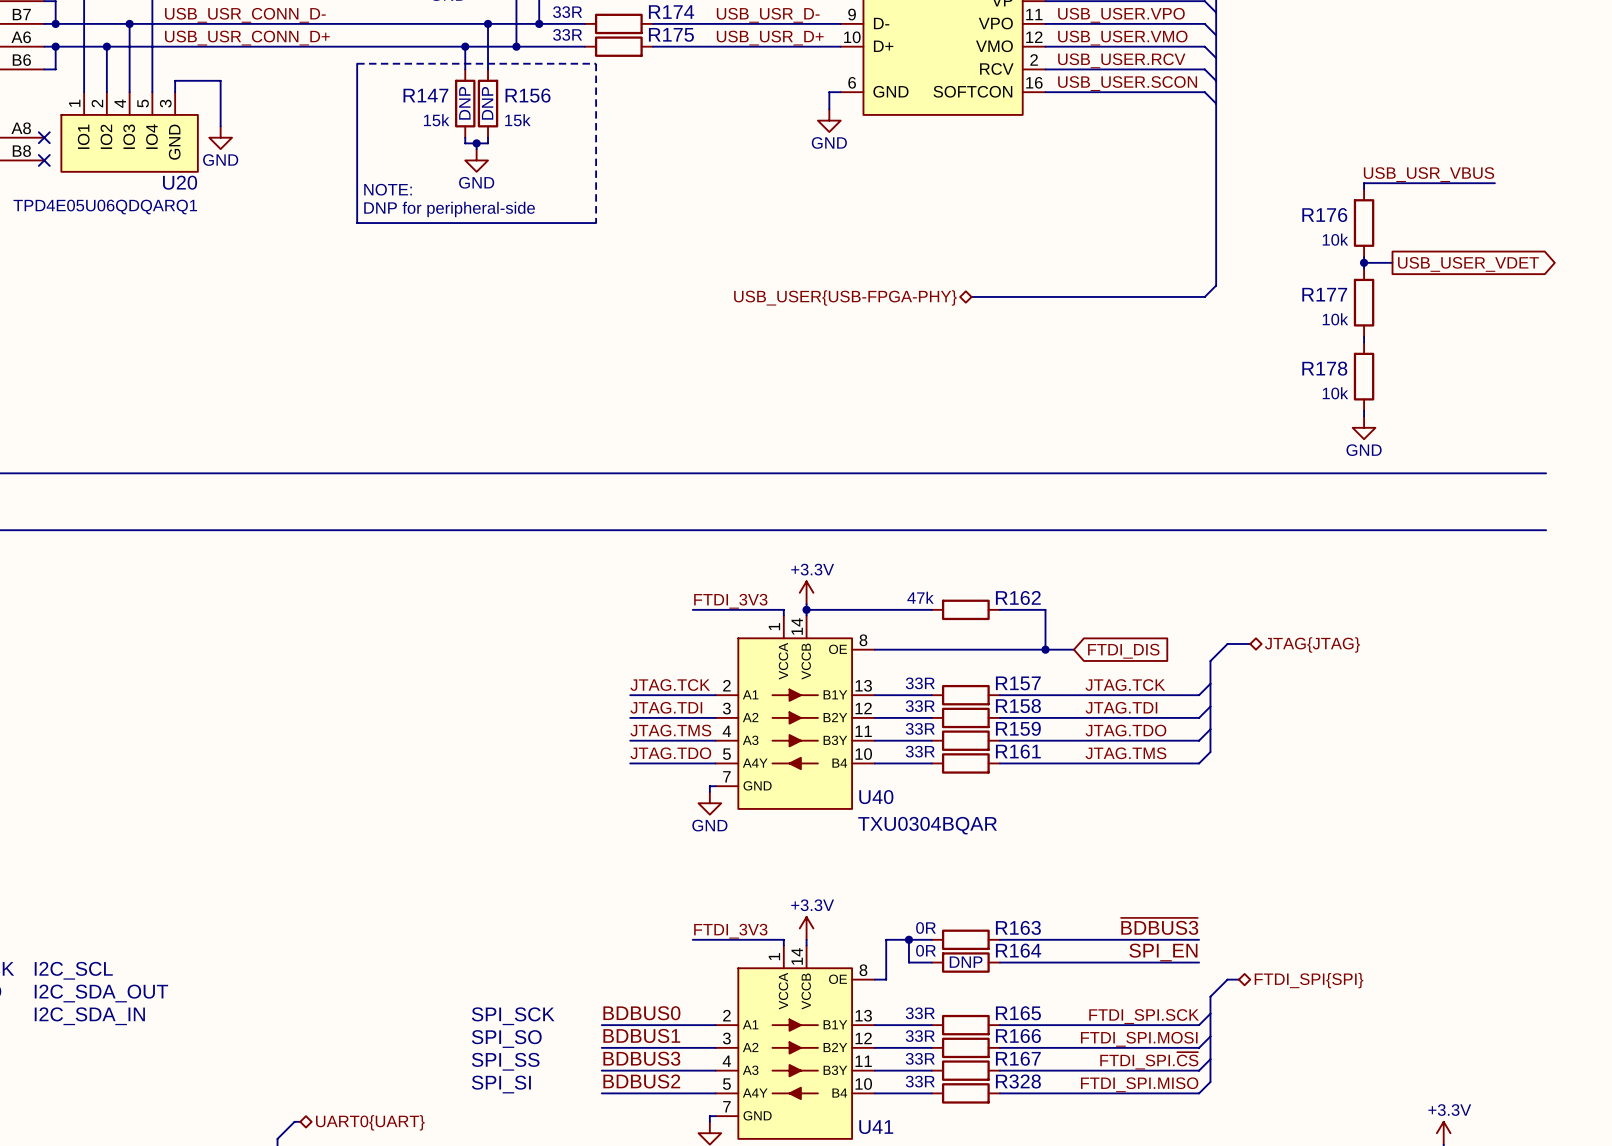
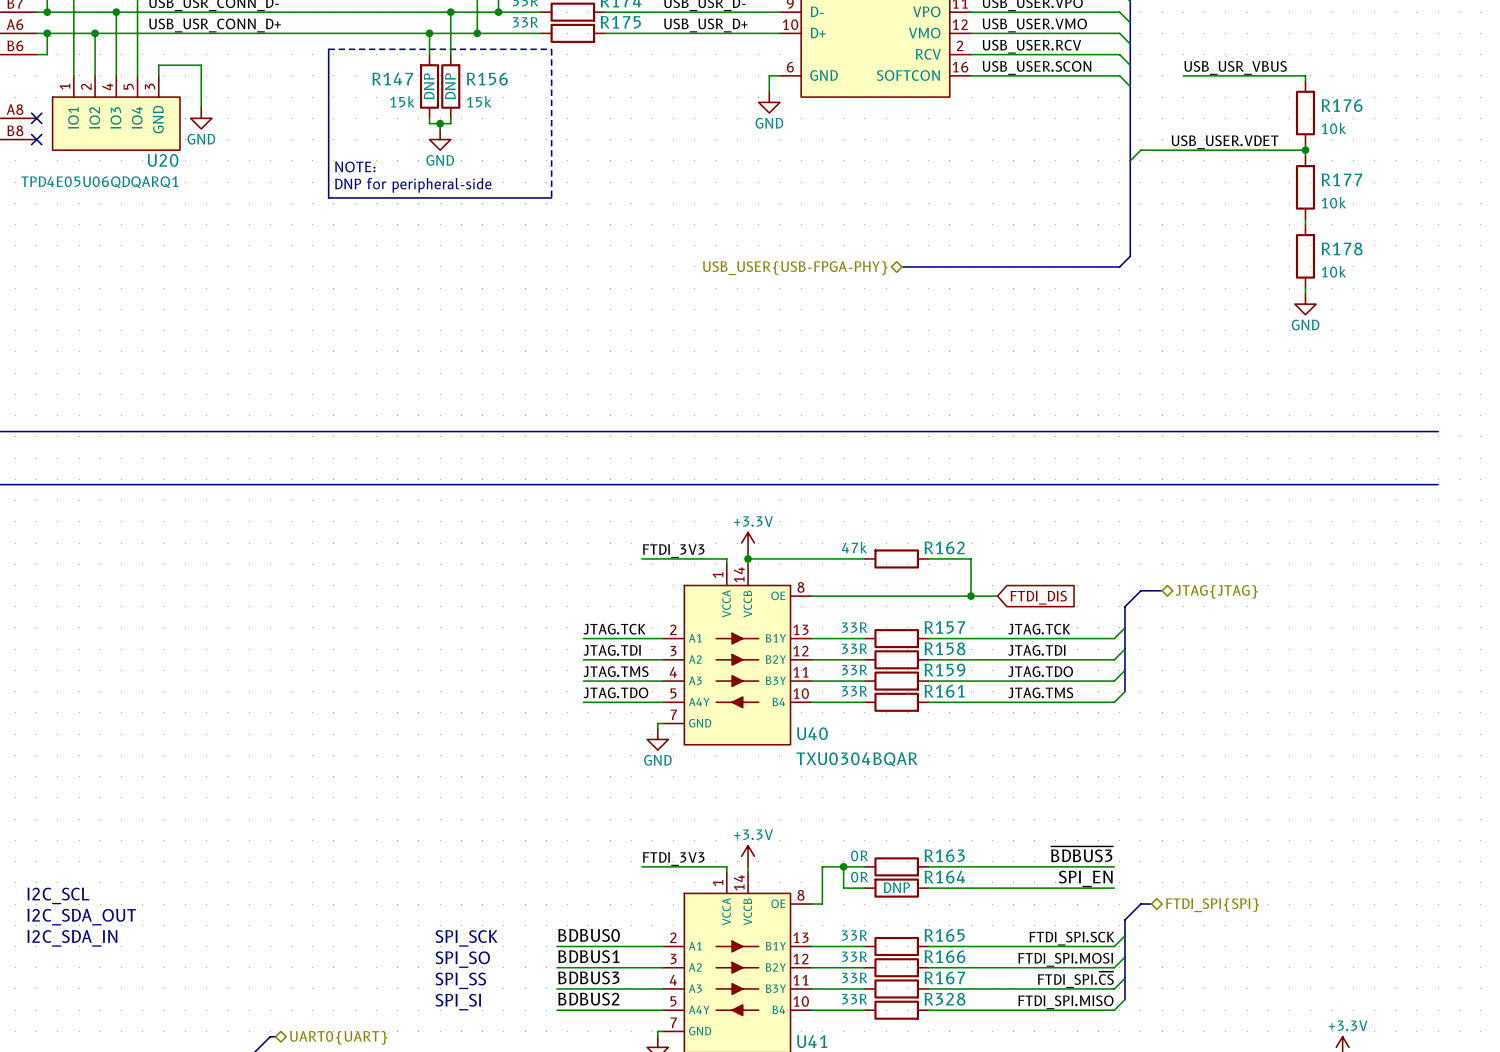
label: none -> USB_USR_VBUS (1235, 67)
wire: none -> (1183, 75) (1305, 75) (1305, 81)
wire: none -> (1305, 150) (1140, 150) (1130, 160)
junction: none -> (1305, 150)
label: USB_USR_VBUS (1428, 174) -> USB_USER.VDET (1225, 142)
wire: (1494, 183) (1364, 183) (1364, 188) -> none
R176 name position: R176 (1324, 215) -> R176 (1342, 105)
R176 position: (1364, 223) -> (1305, 113)
R176 text position: 10k (1335, 239) -> 10k (1333, 128)
wire: (1364, 262) (1392, 262) -> none
junction: (1364, 262) -> none
global label: USB_USER_VDET (1468, 264) -> none
R177 name position: R177 (1324, 294) -> R177 (1341, 179)
R177 position: (1364, 302) -> (1305, 187)
R177 text position: 10k (1335, 319) -> 10k (1333, 202)
wire: (1364, 336) (1364, 342) -> (1305, 219) (1305, 224)
R178 name position: R178 (1324, 368) -> R178 (1342, 248)
R178 position: (1364, 376) -> (1305, 256)
R178 text position: 10k (1335, 393) -> 10k (1333, 271)
wire: (1364, 410) (1364, 416) -> (1305, 288) (1305, 293)
power symbol position: GND (1364, 427) -> GND (1305, 304)

